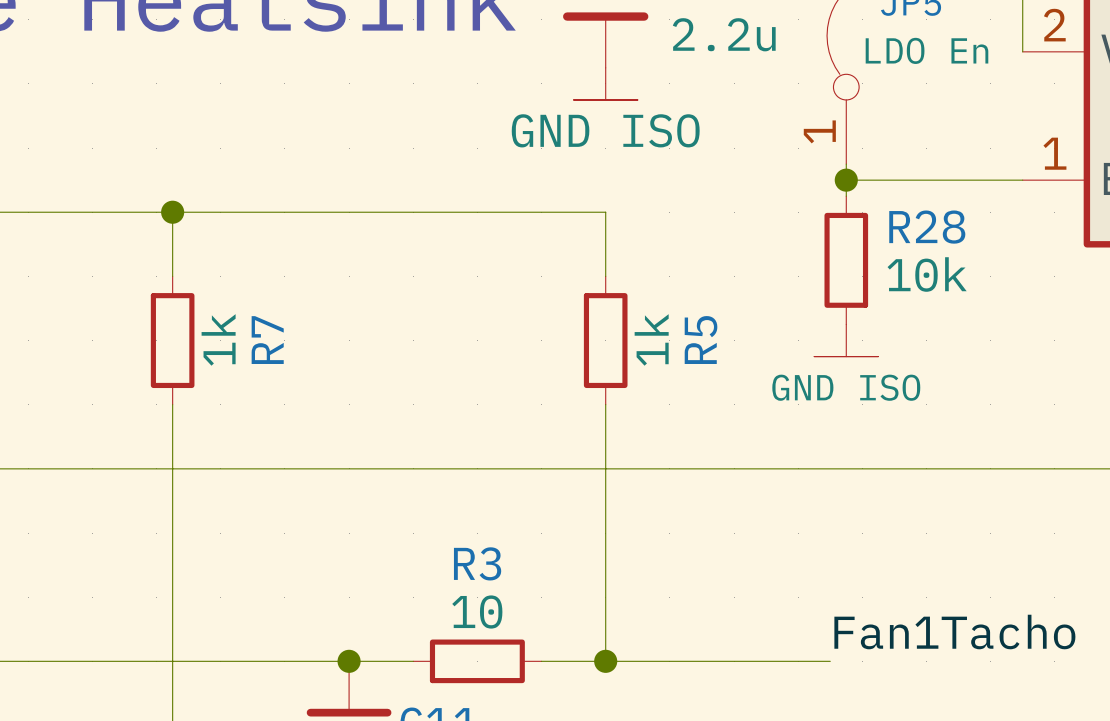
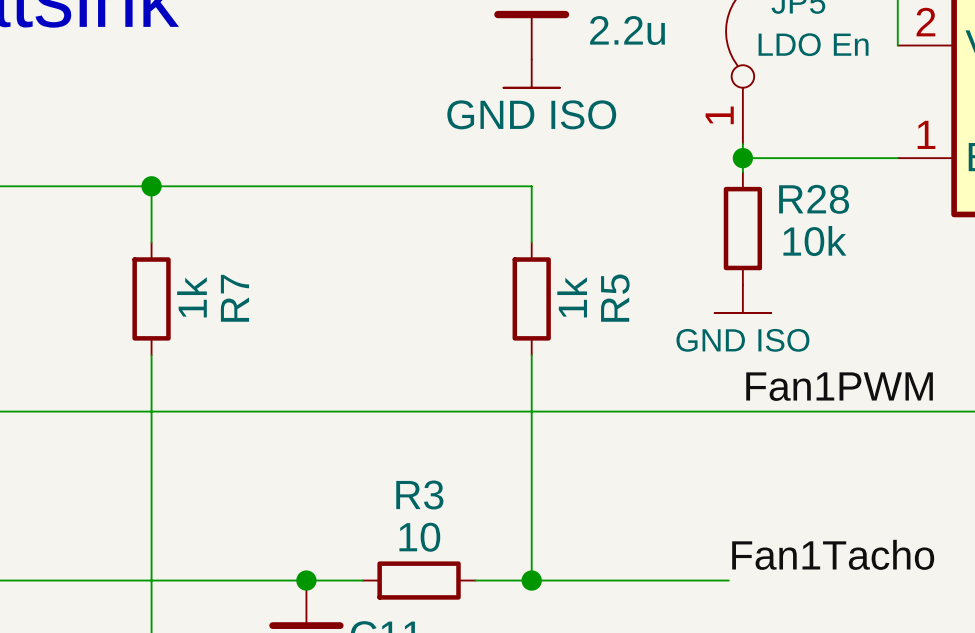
label: none -> Fan1PWM (839, 386)

